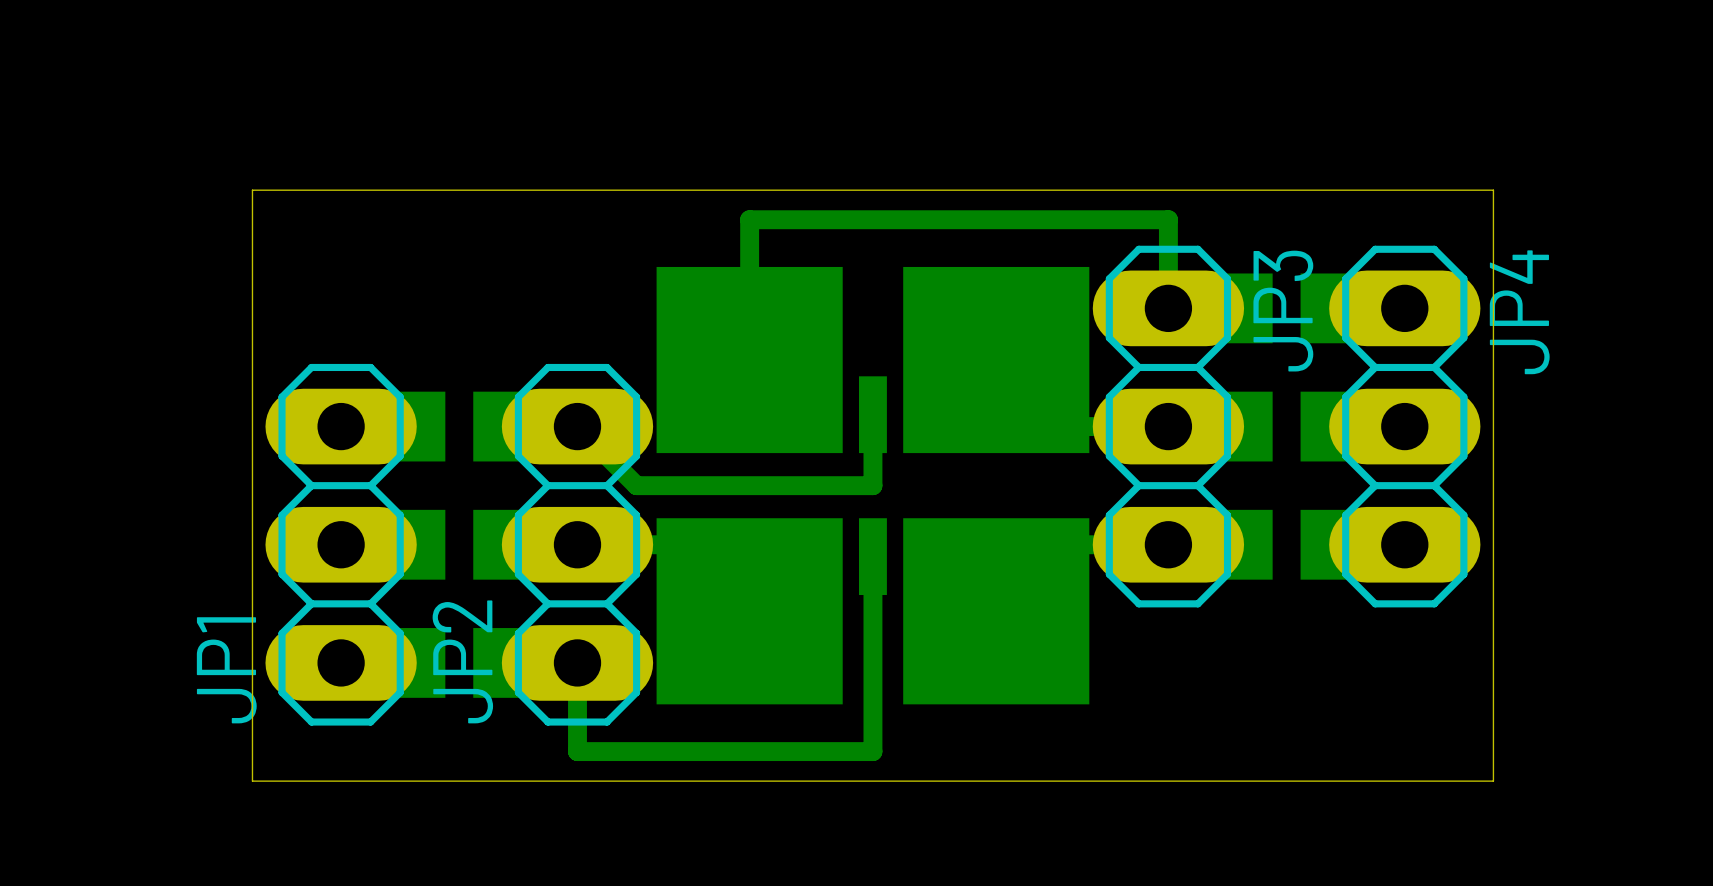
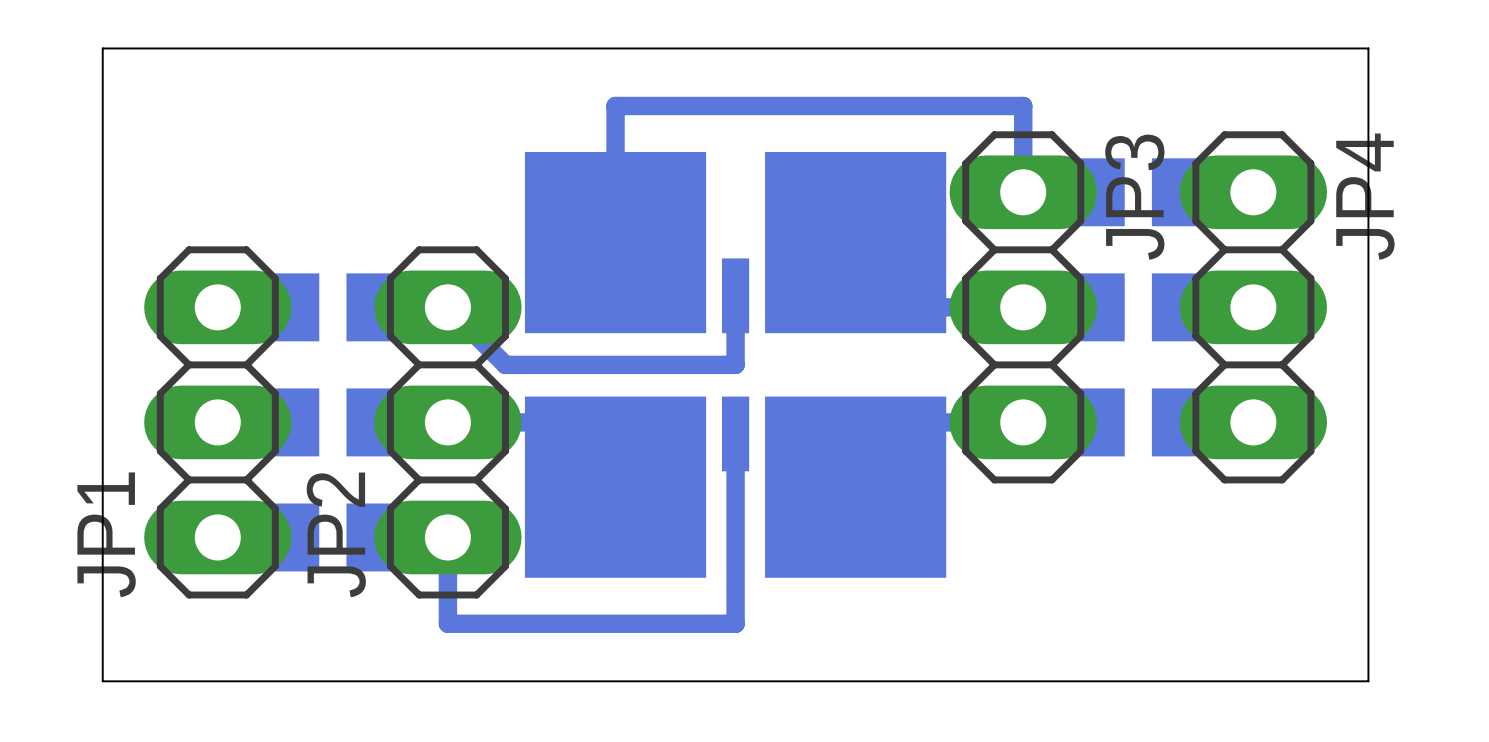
board edge: (252, 190) (1493, 190) (1493, 781) (252, 781) (252, 190) -> (102, 48) (102, 681) (1368, 681) (1368, 48) (102, 48)

